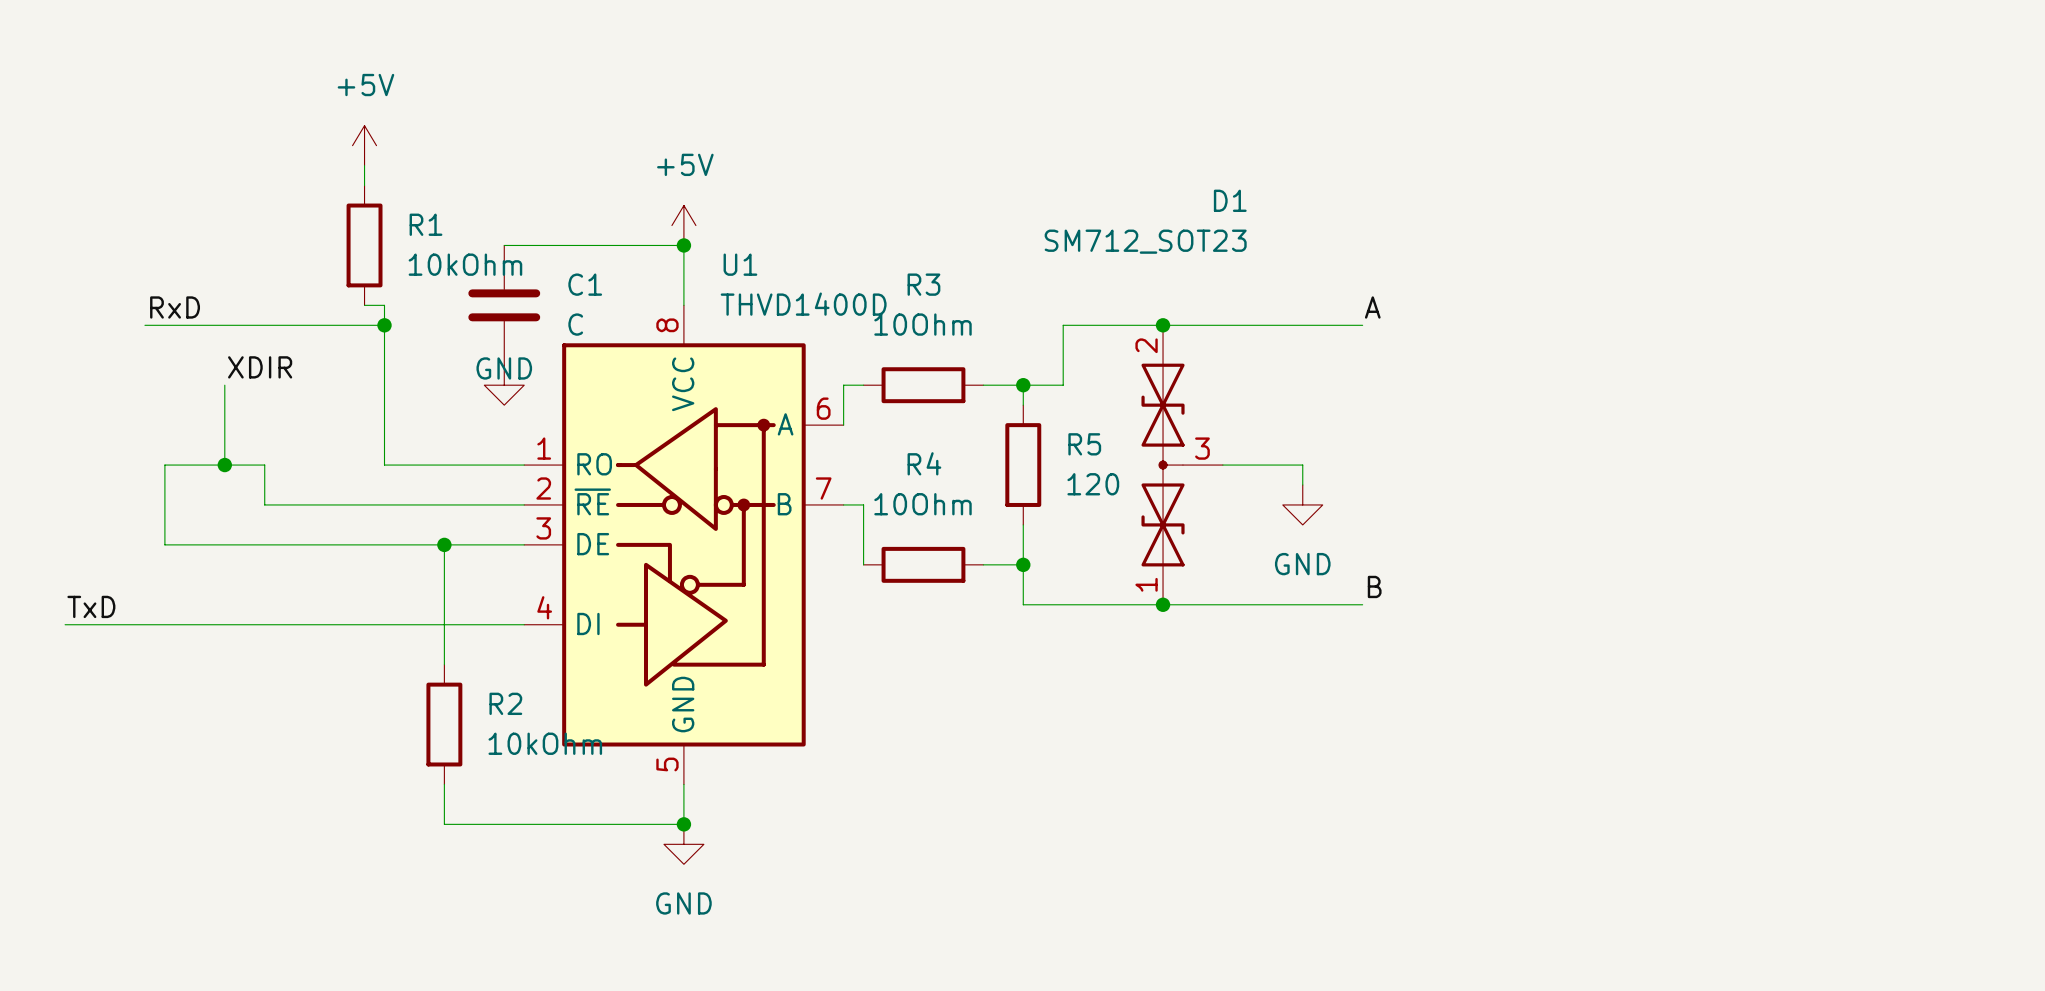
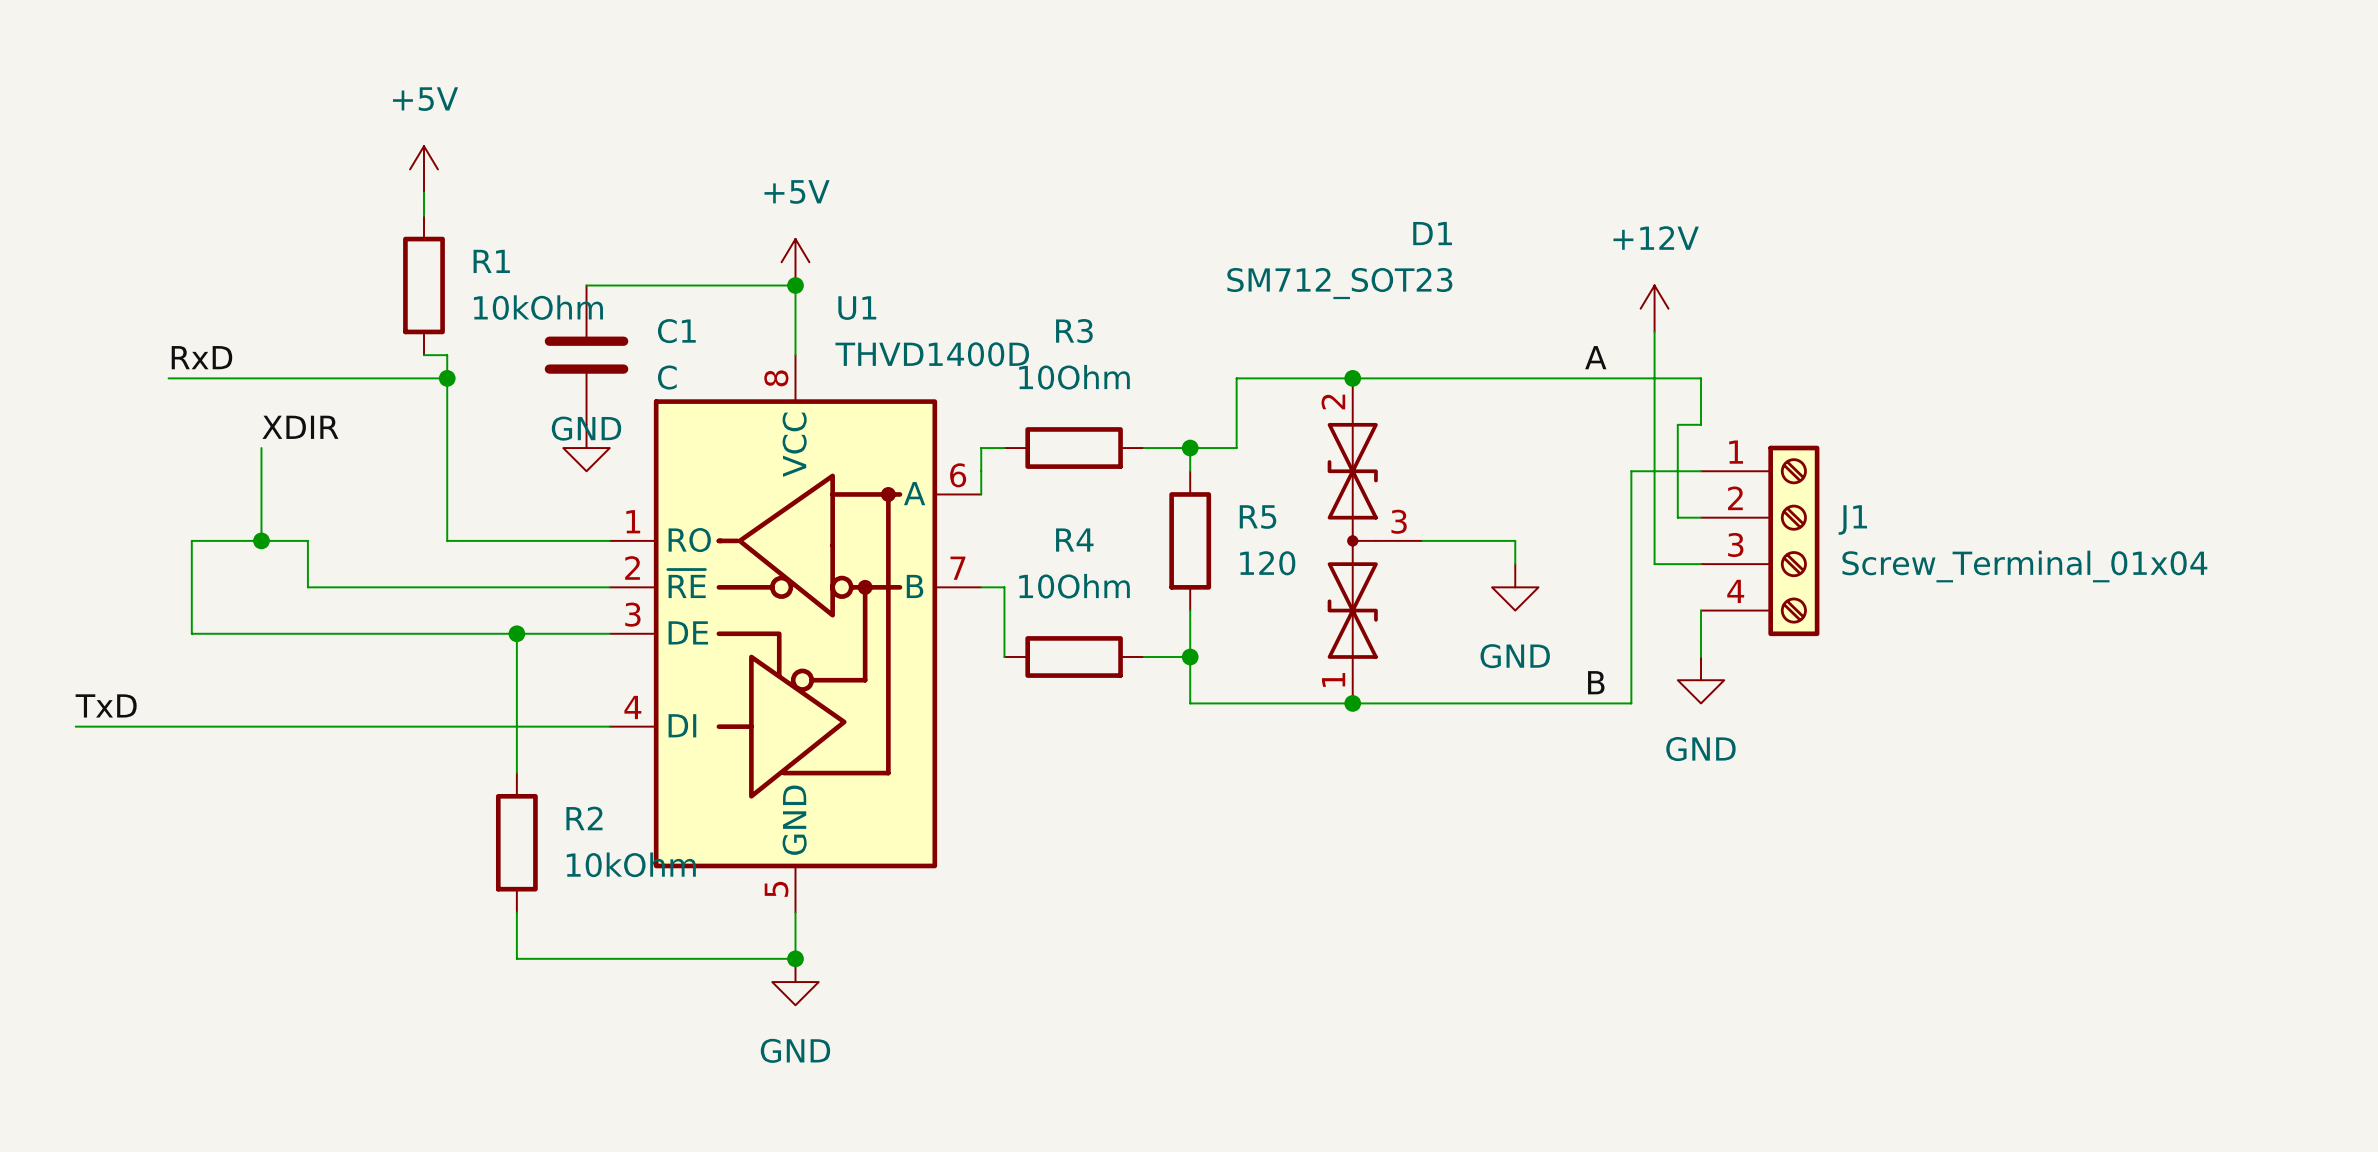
power symbol: none -> +12V (1654, 308)
wire: none -> (1654, 331) (1654, 564) (1701, 564)
wire: none -> (1584, 378) (1701, 378) (1701, 424) (1677, 424) (1677, 517) (1701, 517)
wire: none -> (1701, 471) (1631, 471) (1631, 703) (1584, 703)
J1: none -> Screw_Terminal_01x04 (1760, 540)
wire: none -> (1701, 610) (1701, 656)
power symbol: none -> GND (1701, 680)

